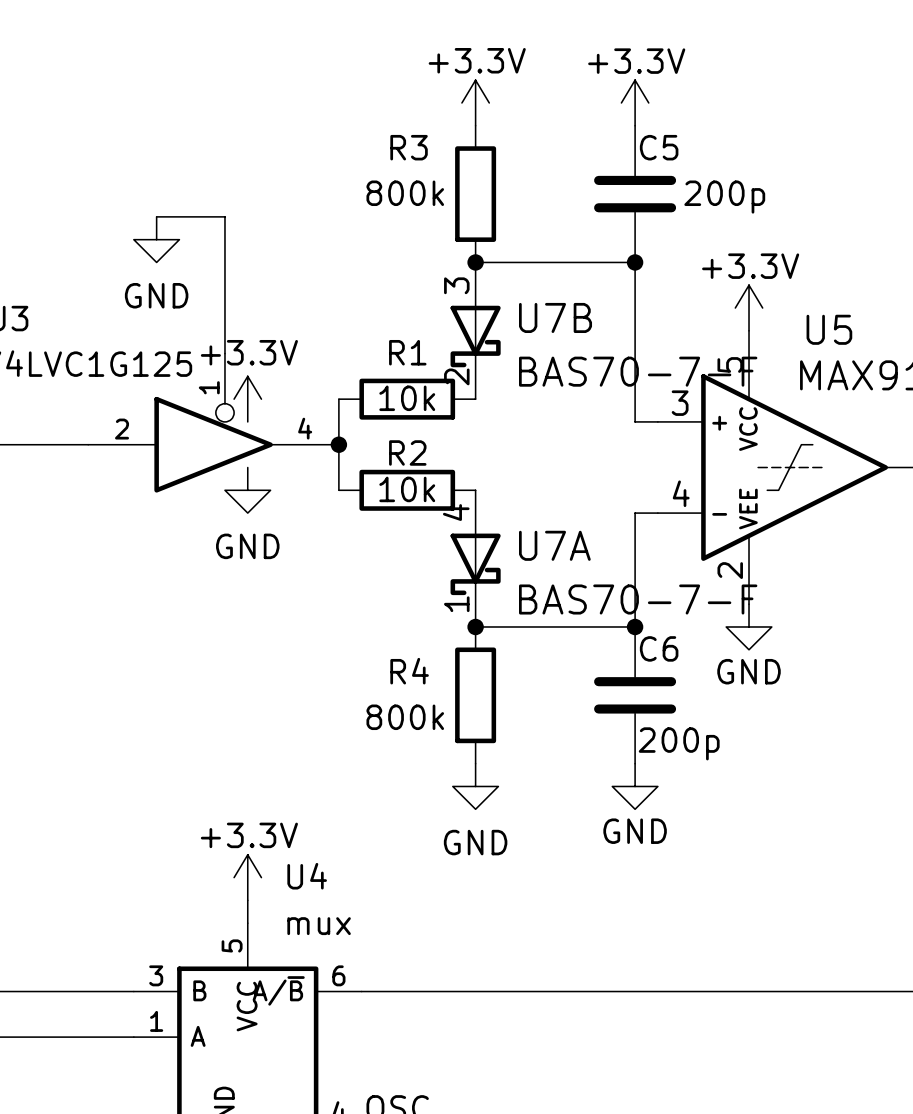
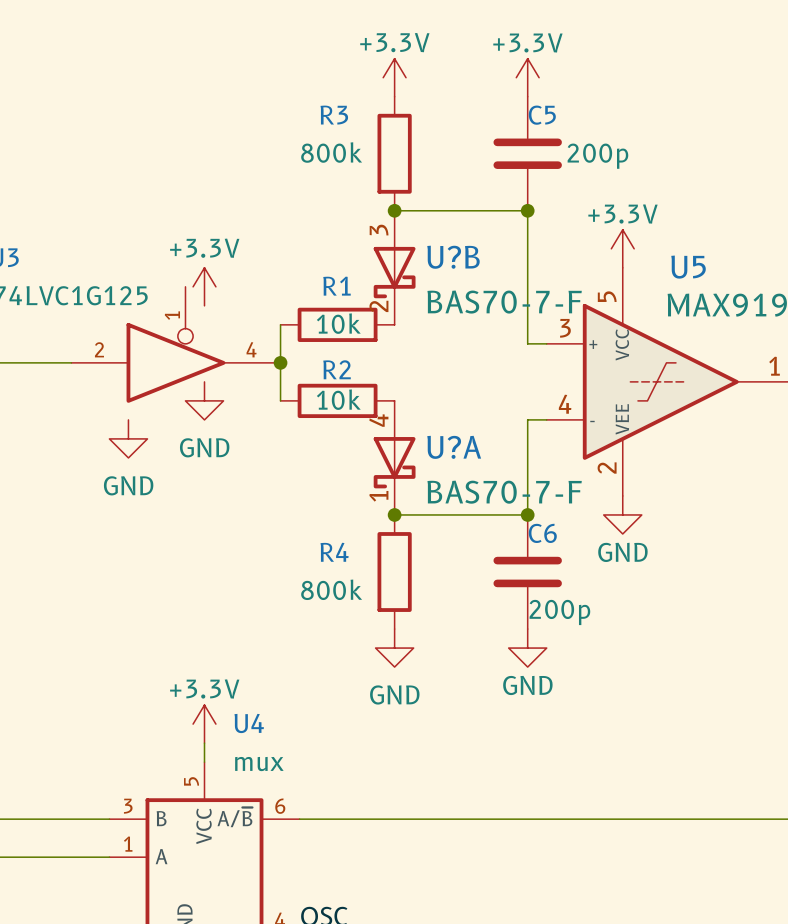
wire: (156, 216) (224, 216) (224, 353) -> none
power symbol position: GND (156, 239) -> GND (128, 438)
U7B name: U7B (555, 317) -> U?B (453, 257)
power symbol position: +3.3V (247, 399) -> +3.3V (204, 286)
U7A name: U7A (554, 545) -> U?A (454, 447)

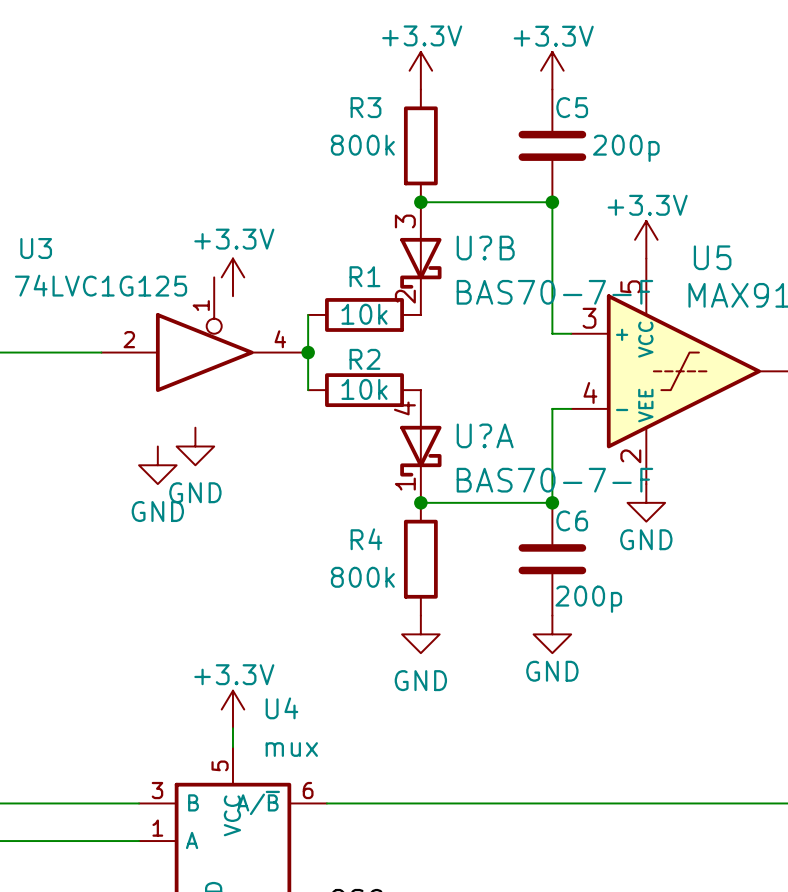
power symbol: GND (204, 400) -> none
power symbol: GND (128, 438) -> none
power symbol: none -> GND (195, 446)
power symbol: none -> GND (157, 465)

